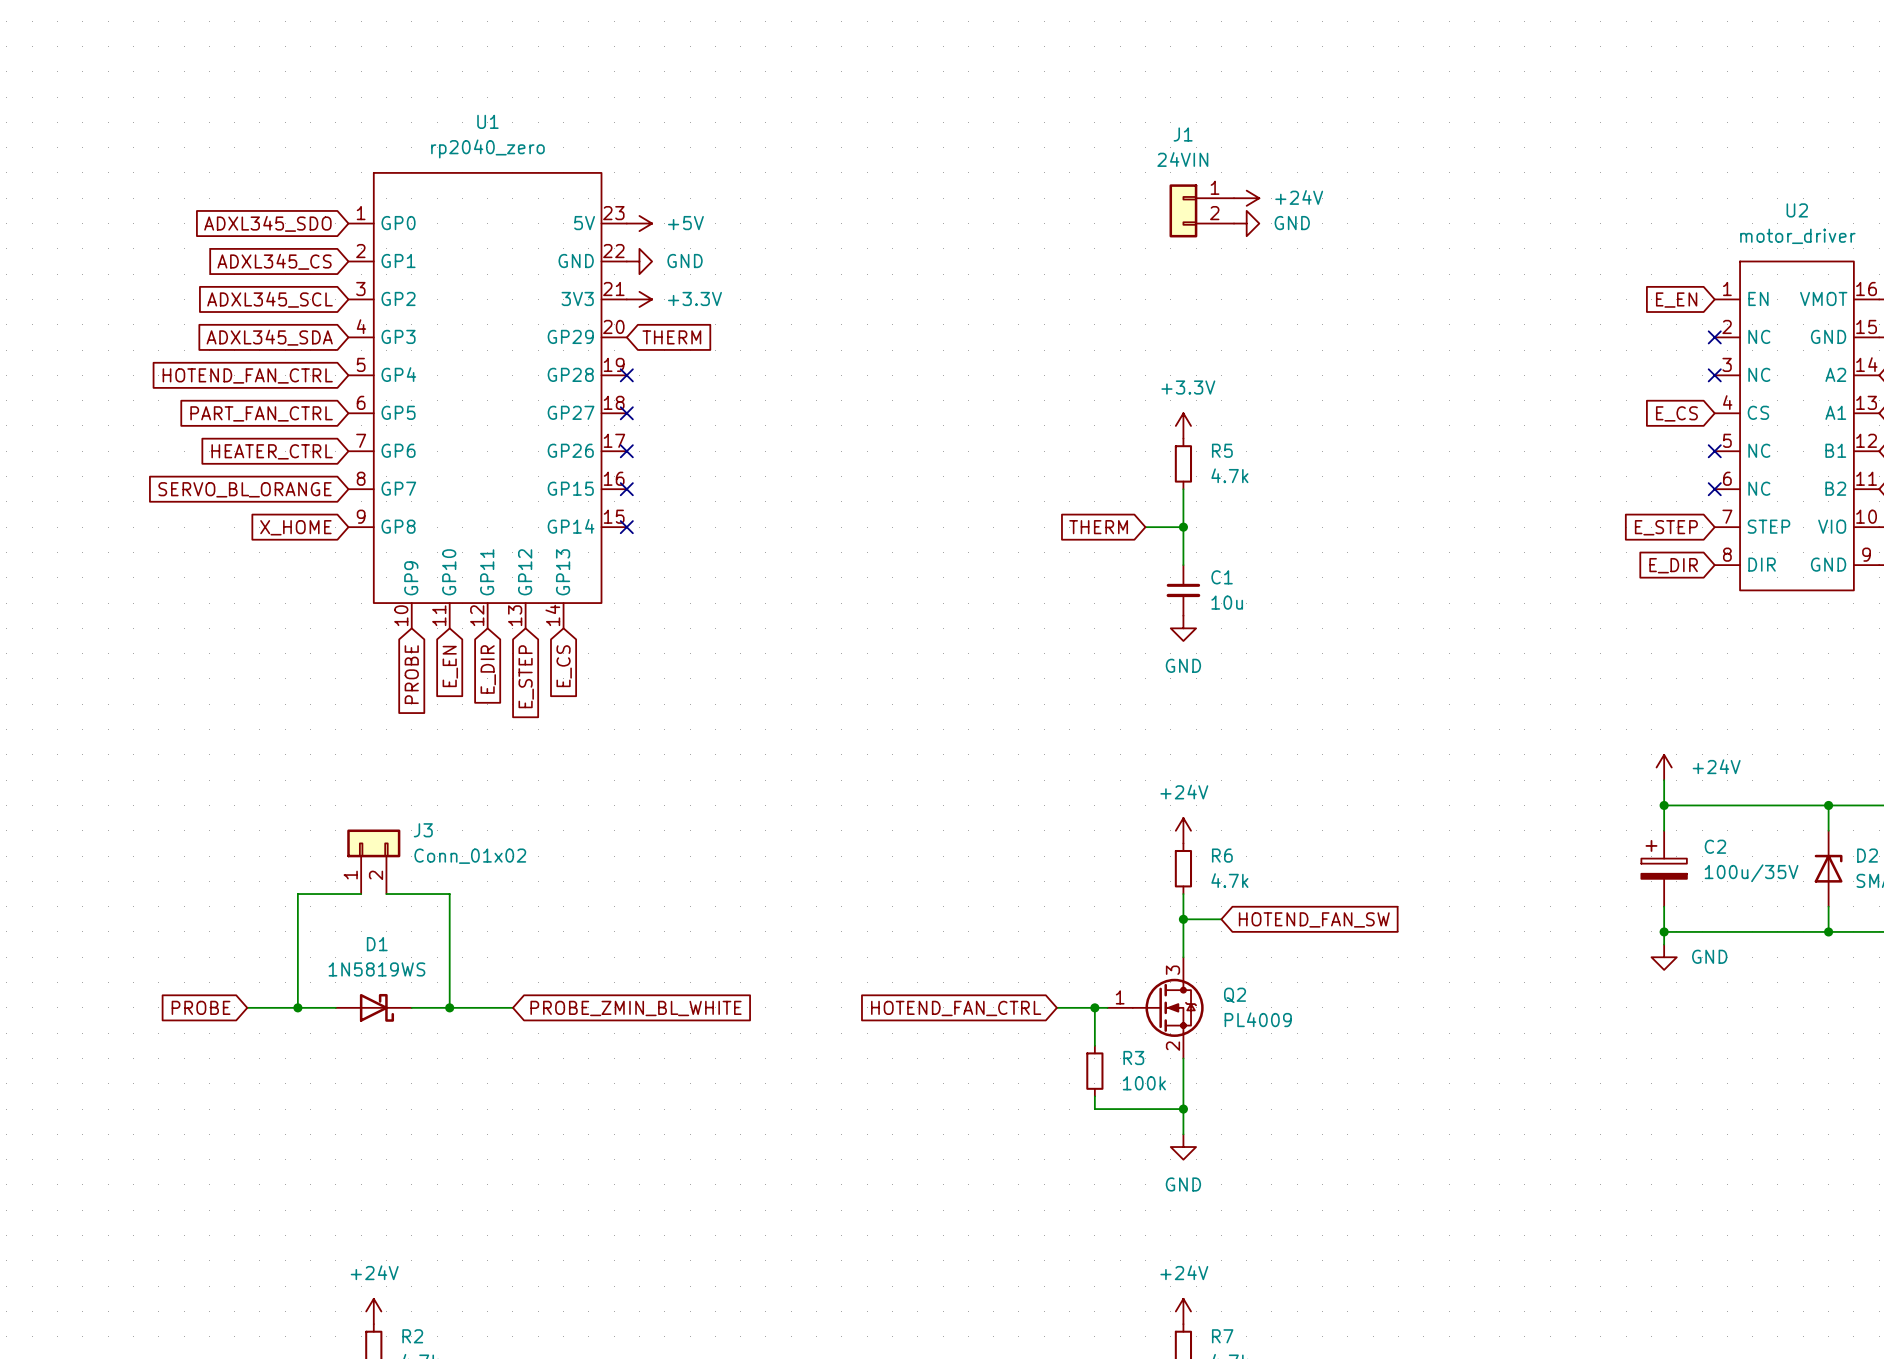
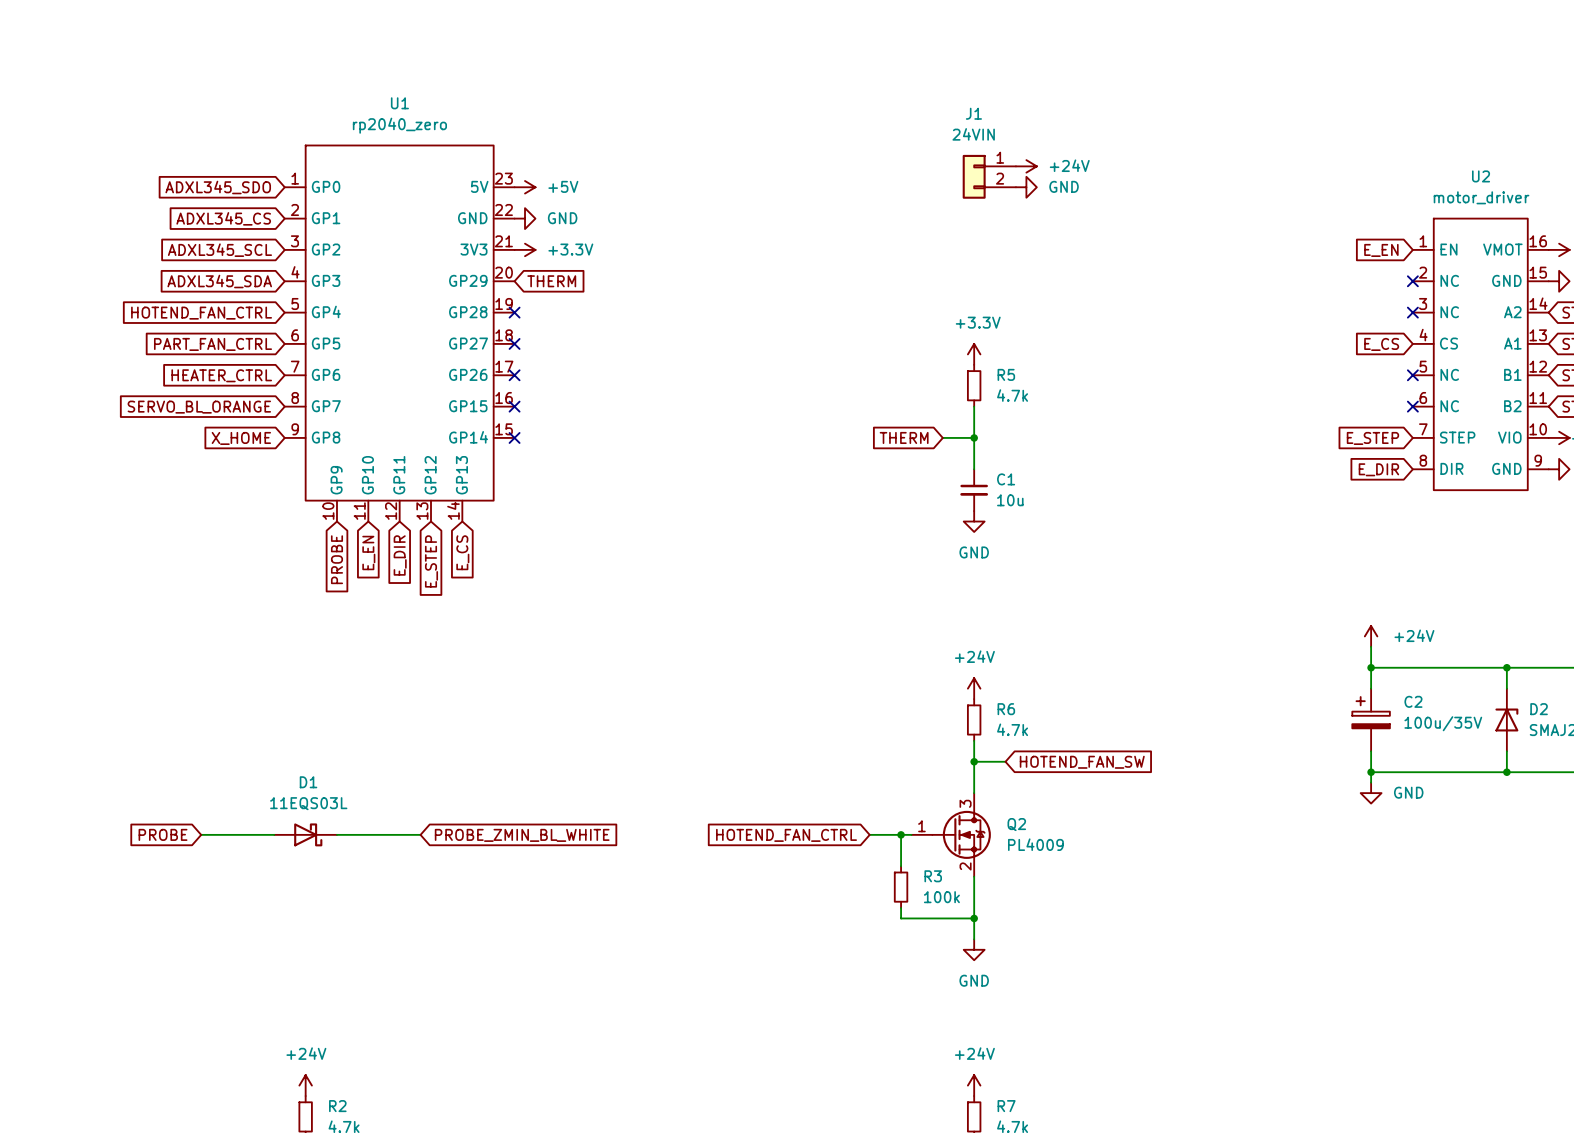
J3: Conn_01x02 (373, 861) -> none
wire: (361, 894) (297, 894) (297, 1007) -> none
wire: (386, 894) (449, 894) (449, 1007) -> none
D1 value: 1N5819WS (376, 969) -> 11EQS03L (308, 803)
junction: (297, 1007) -> none
junction: (449, 1007) -> none

